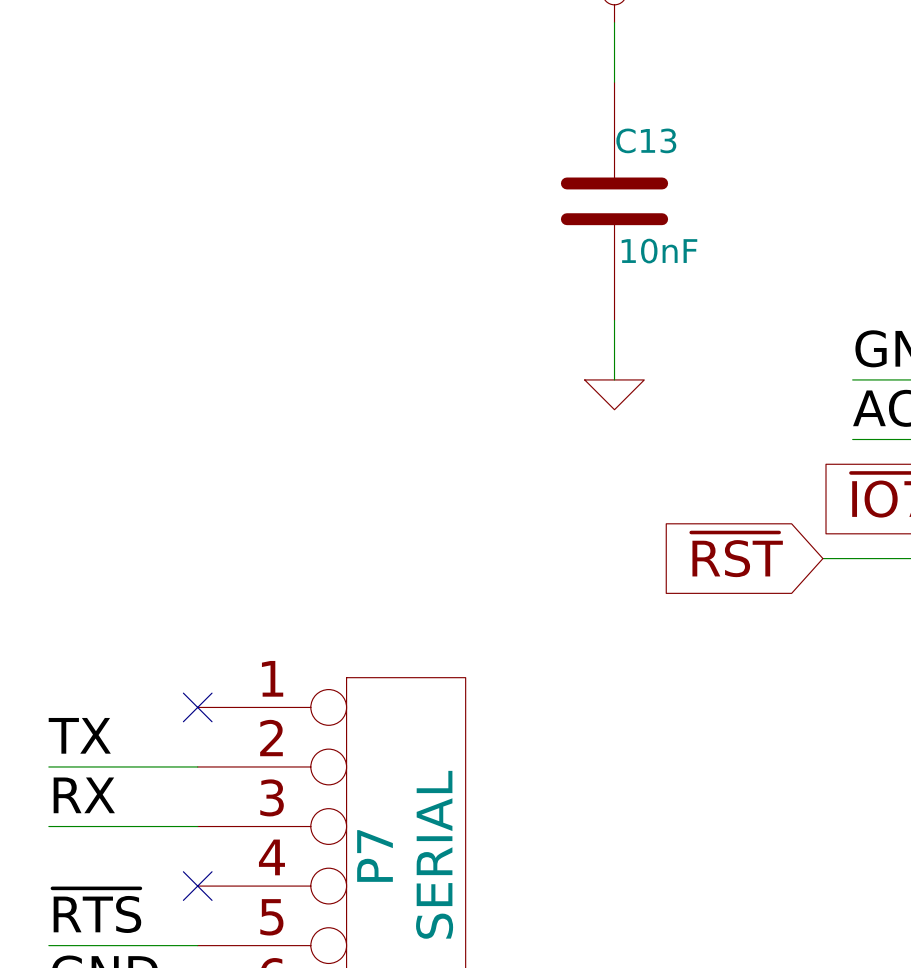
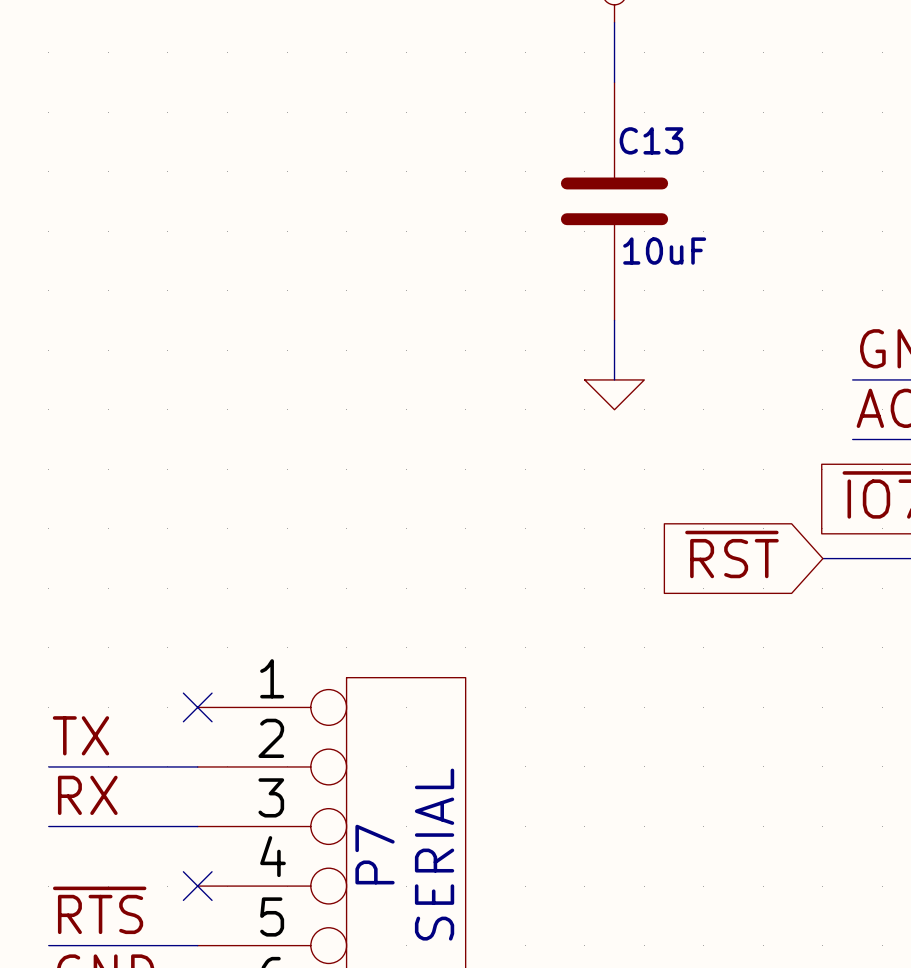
C13 value: 10nF (659, 251) -> 10uF (664, 251)

